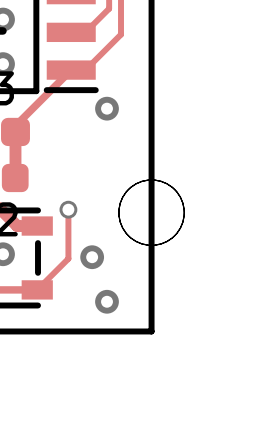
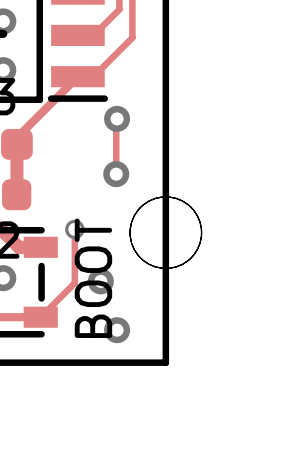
track: none -> (117, 118) (116, 174)
via: none -> (116, 174)
text: none -> BOOT (93, 278)

